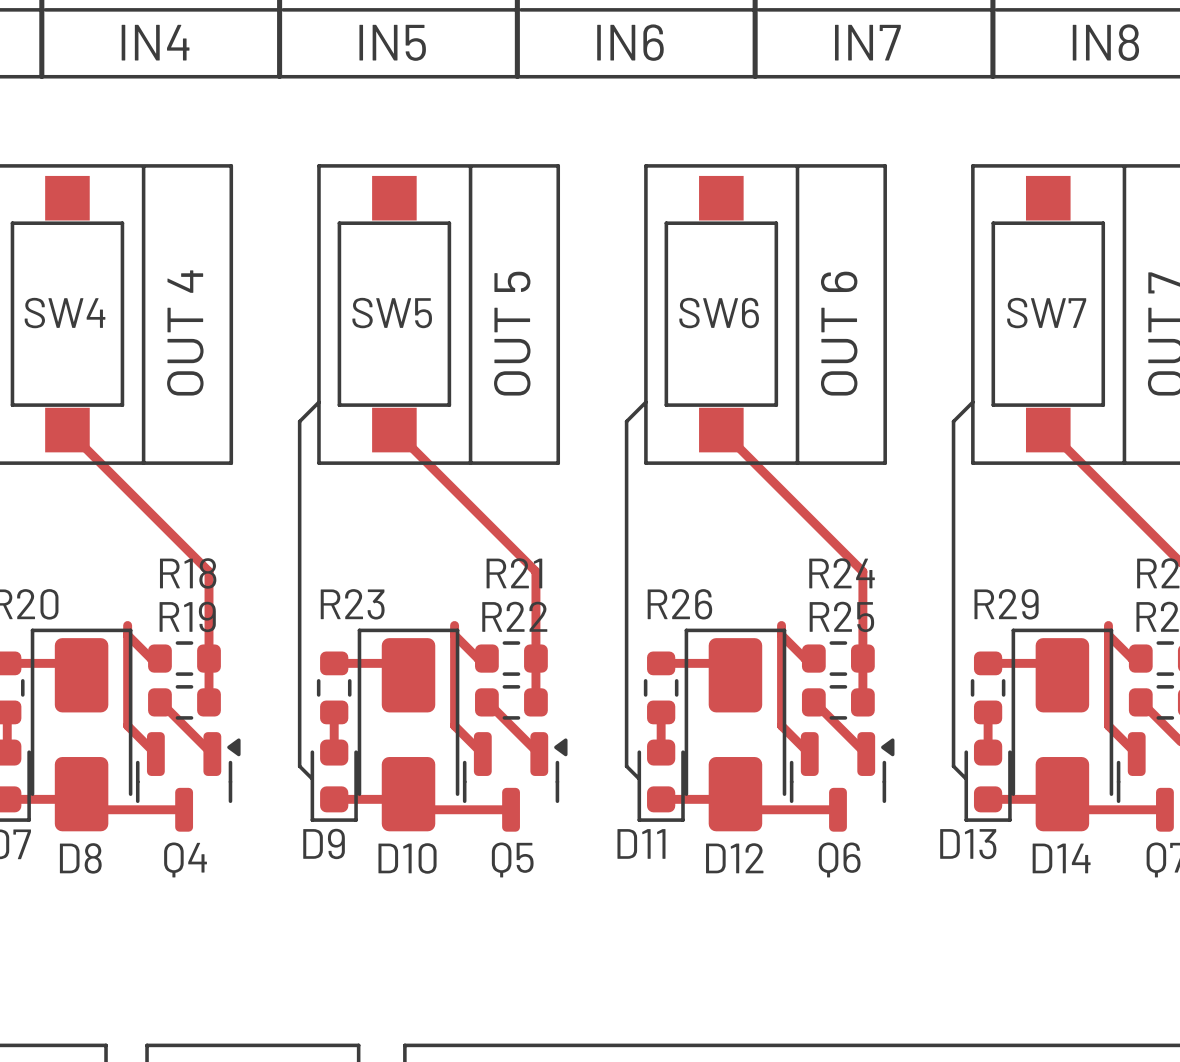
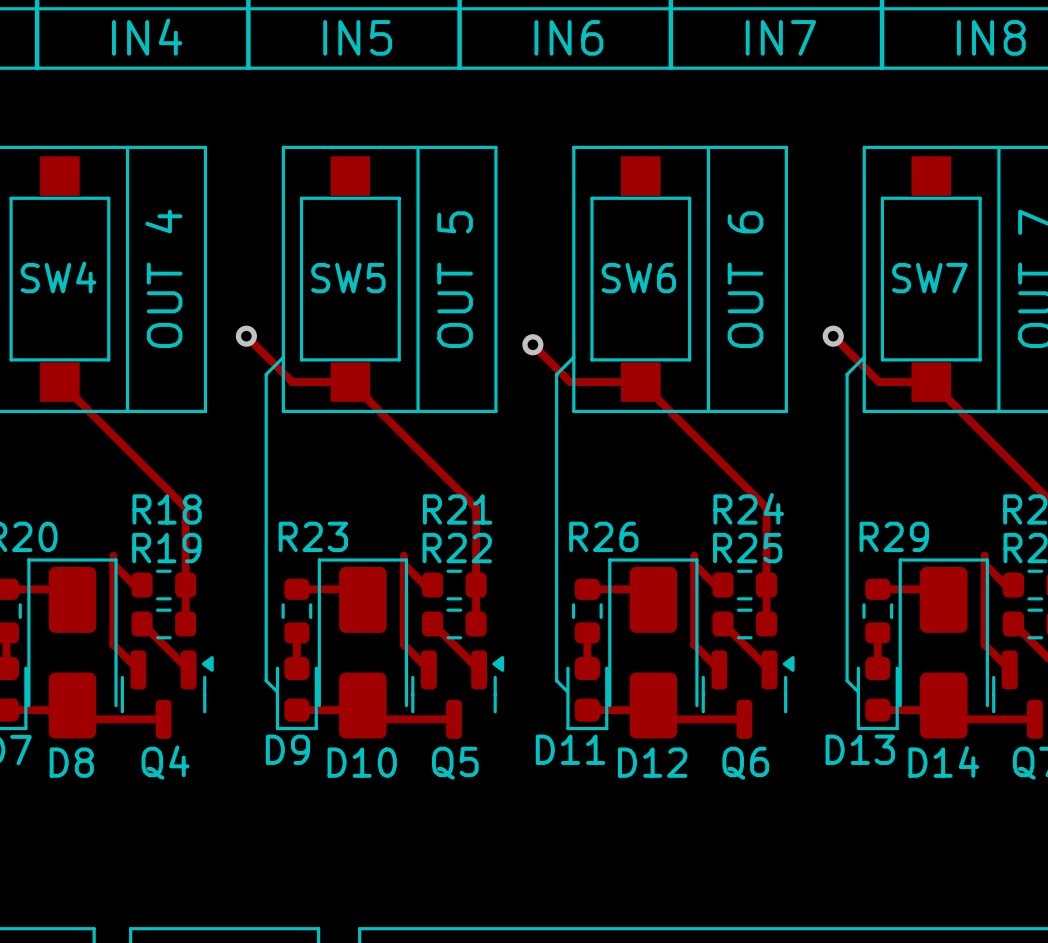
track: none -> (246, 336) (292, 382) (350, 382)
via: none -> (246, 336)
track: none -> (833, 336) (879, 382) (931, 382)
via: none -> (833, 336)
track: none -> (532, 344) (570, 382) (640, 382)
via: none -> (532, 344)

